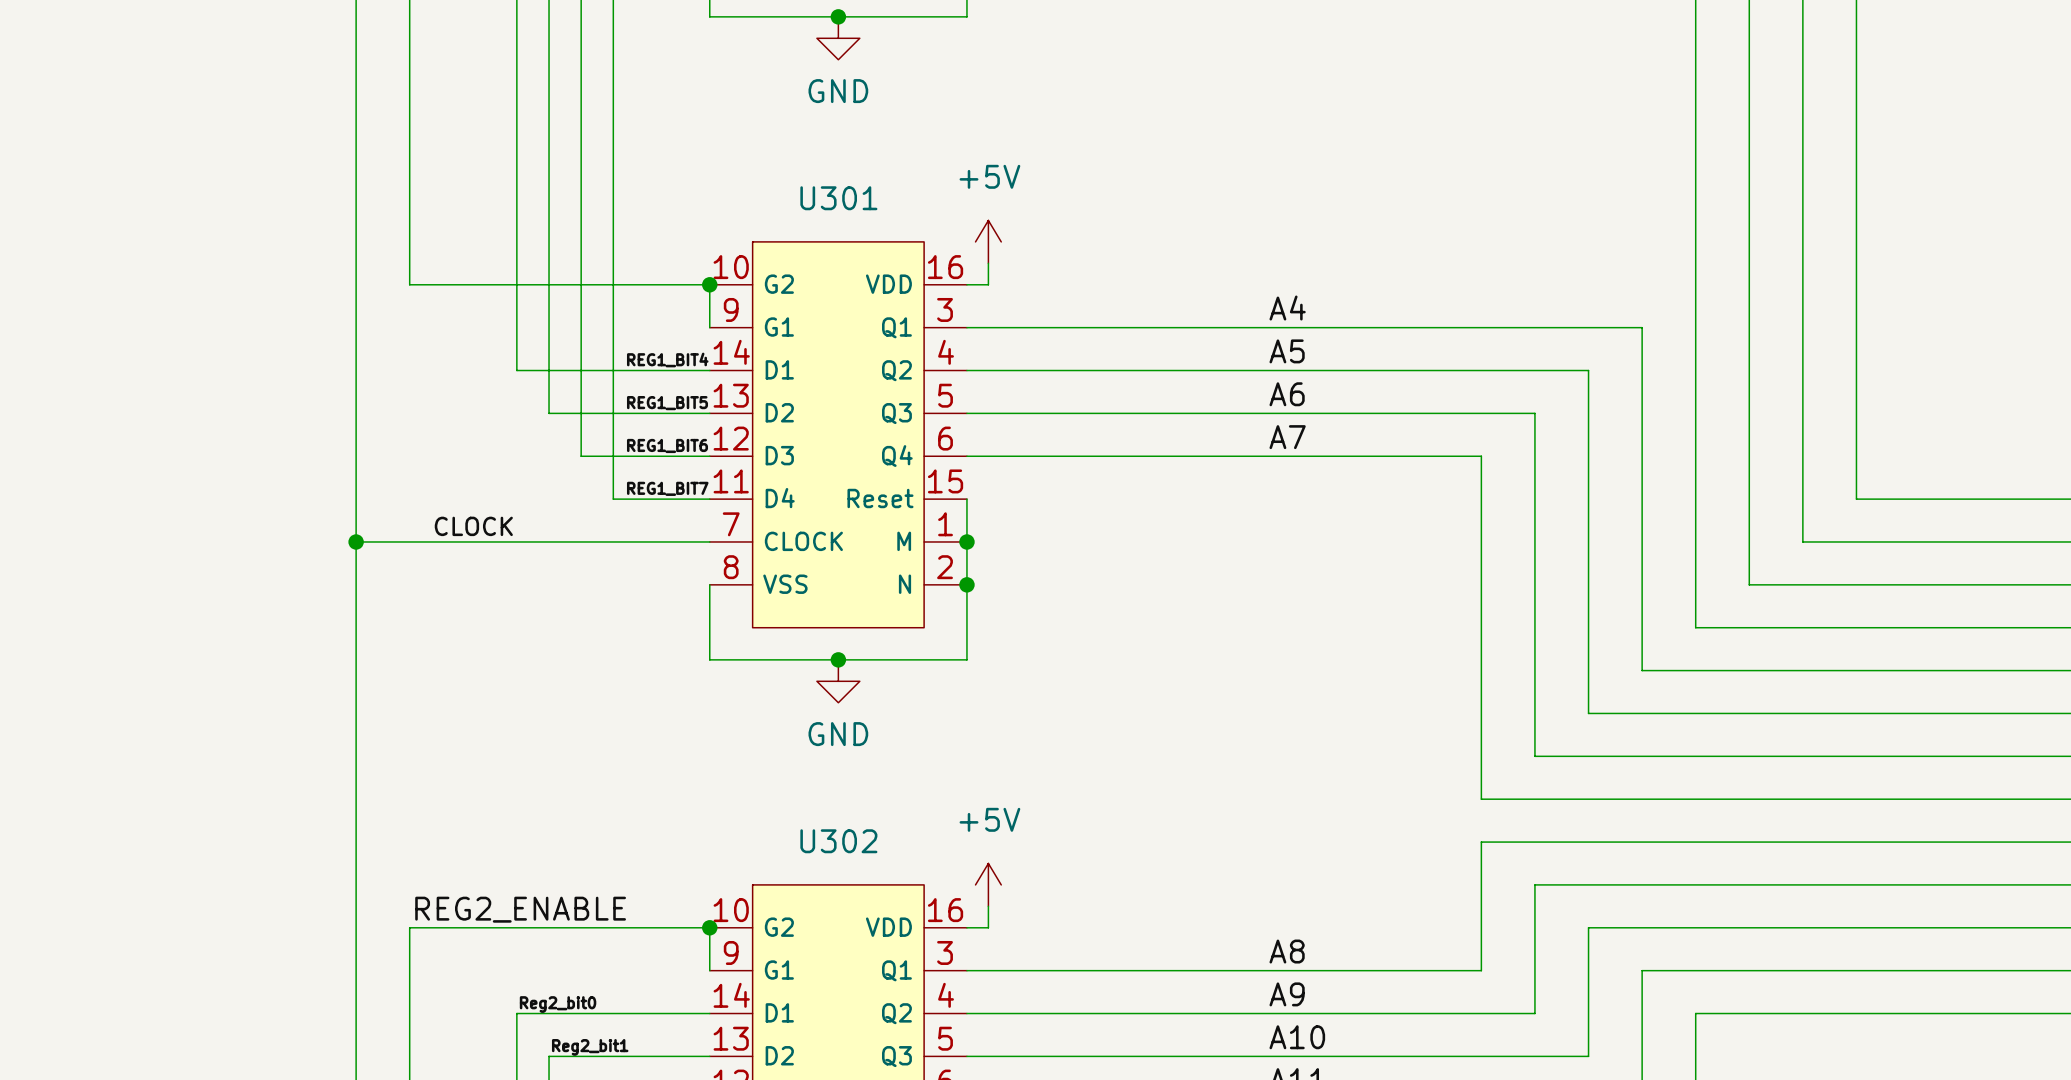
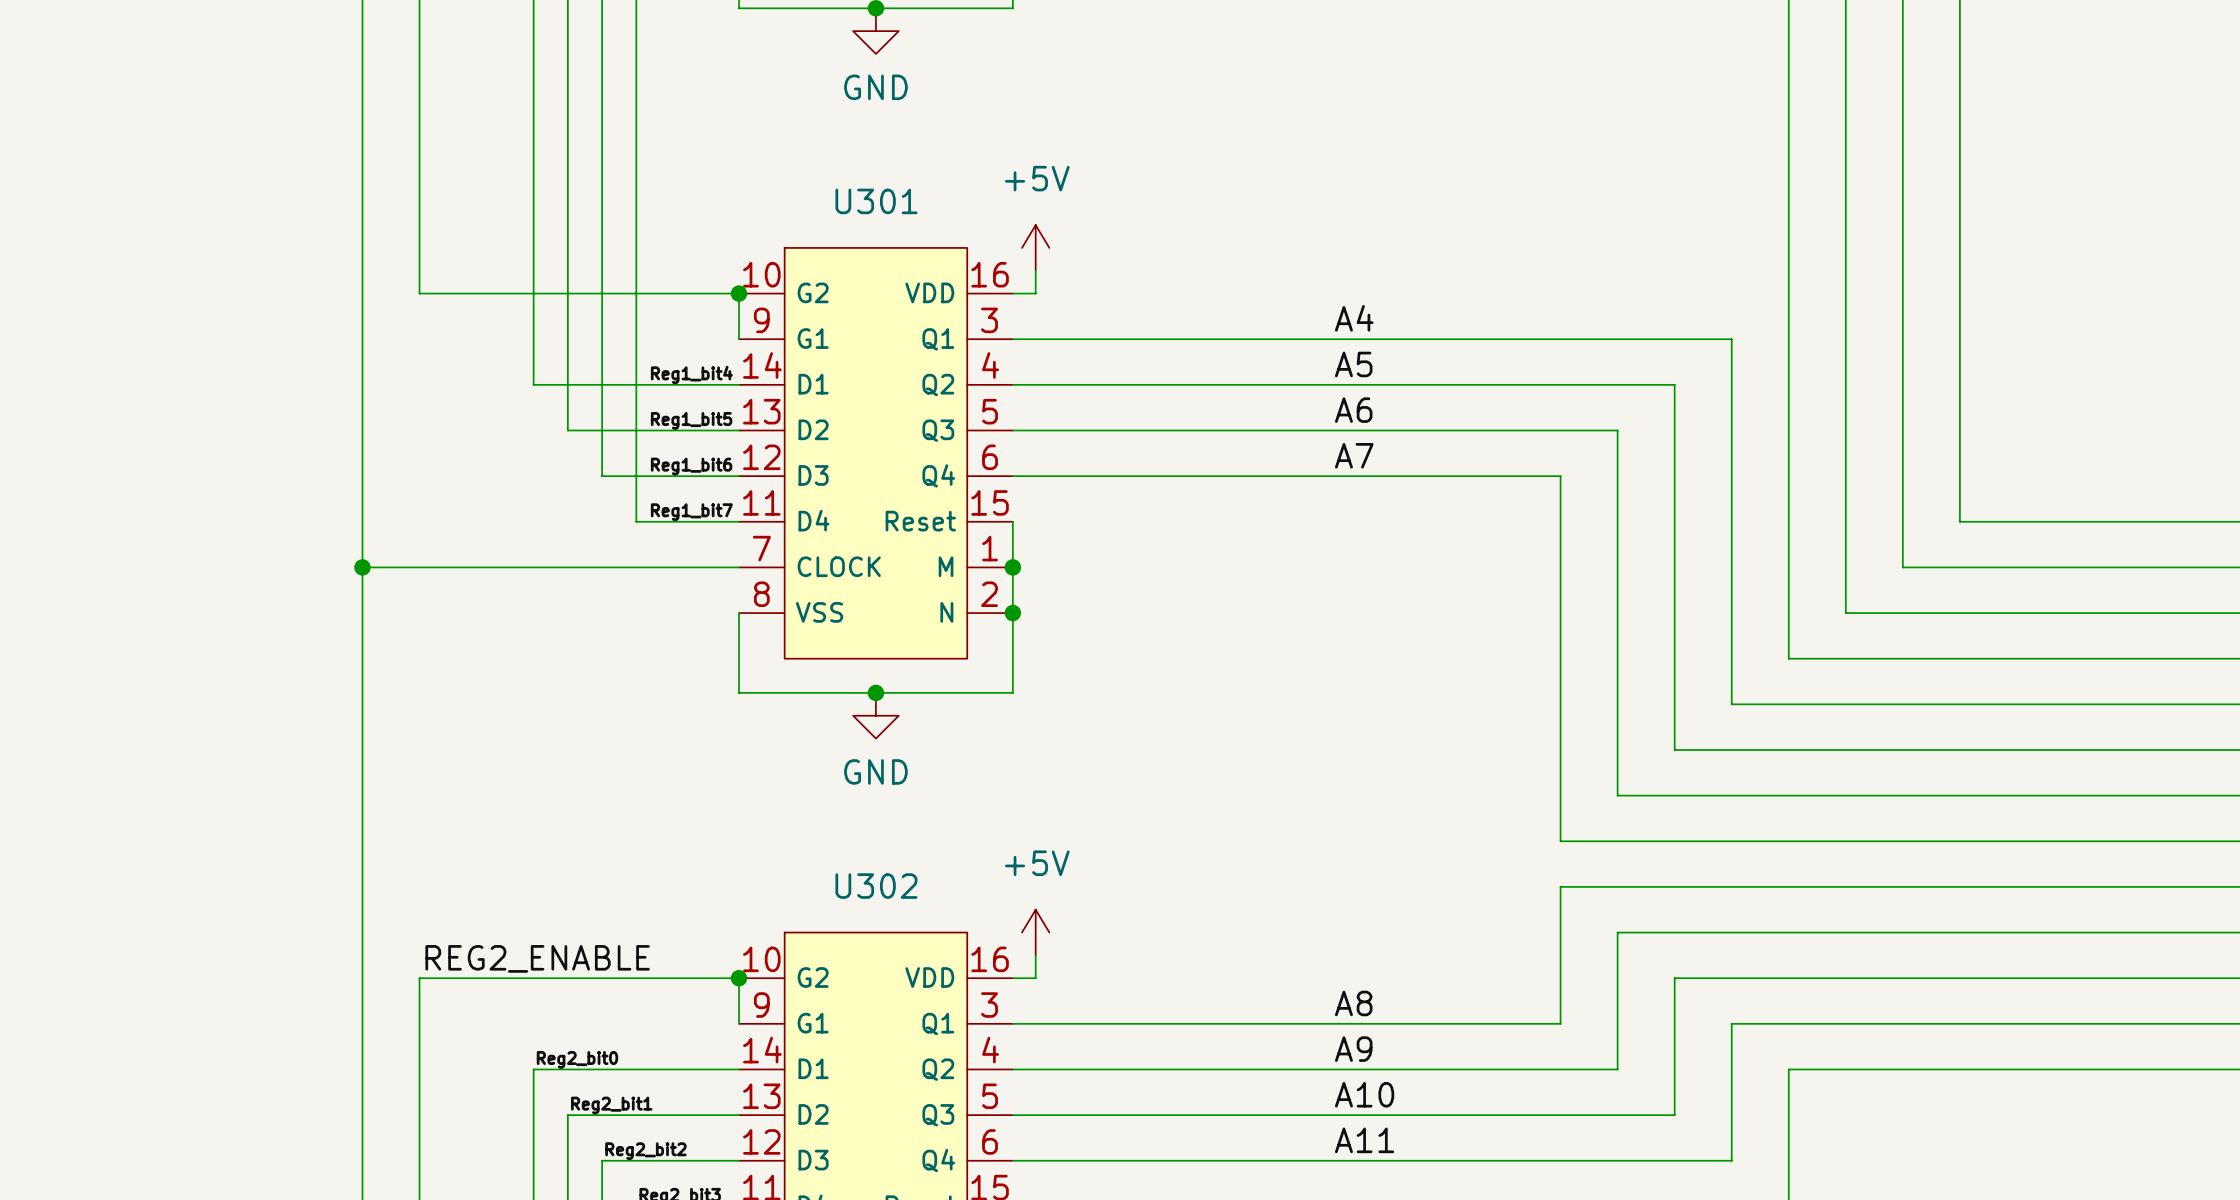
label: REG1_BIT4 (667, 359) -> Reg1_bit4 (691, 374)
label: REG1_BIT5 (667, 403) -> Reg1_bit5 (691, 420)
label: REG1_BIT6 (667, 445) -> Reg1_bit6 (691, 466)
label: REG1_BIT7 (667, 488) -> Reg1_bit7 (691, 512)
label: CLOCK (473, 526) -> none

